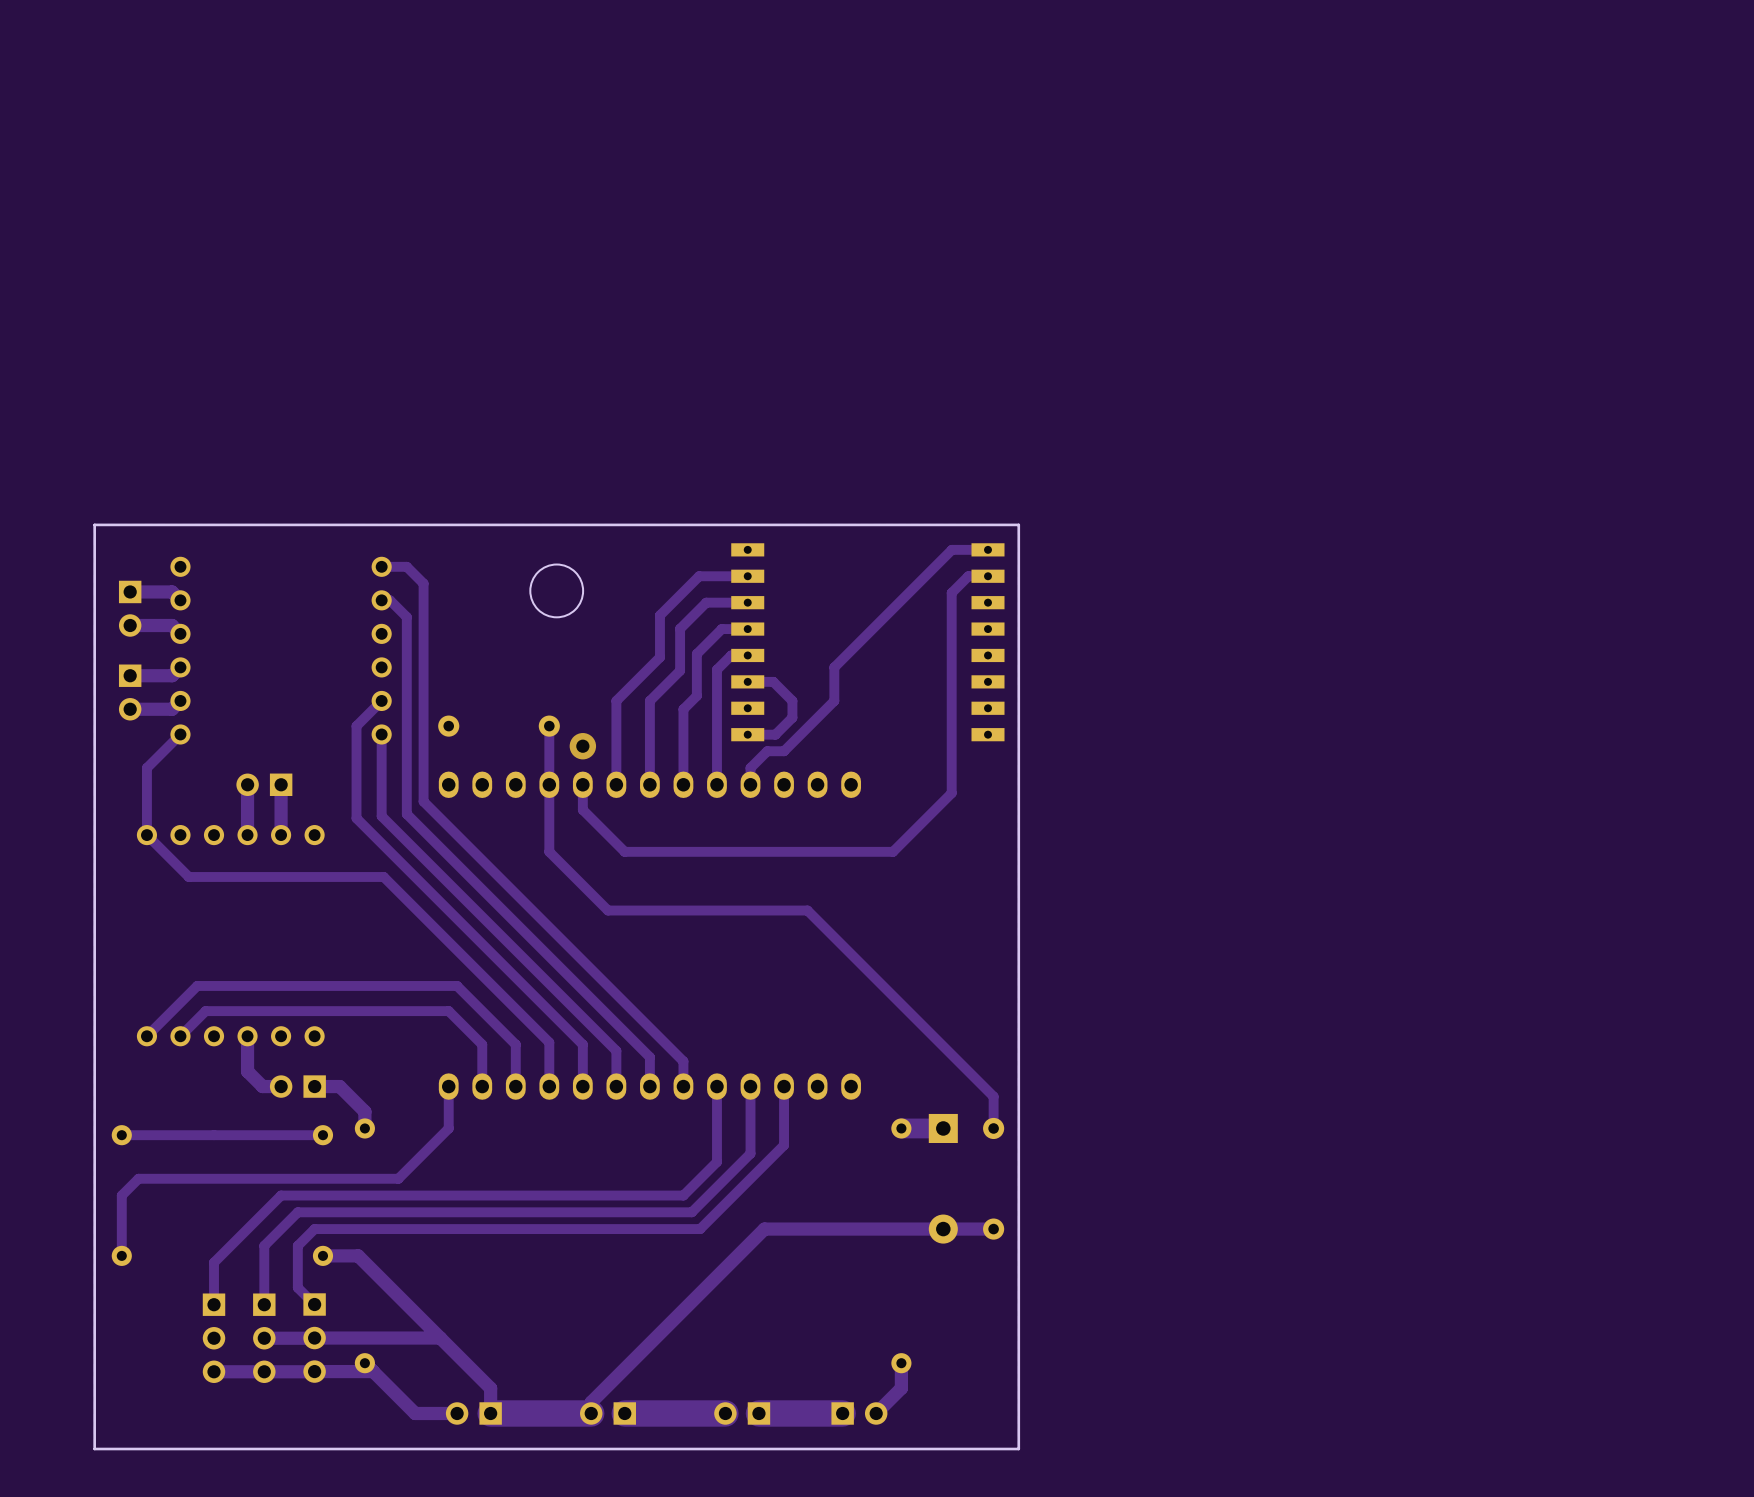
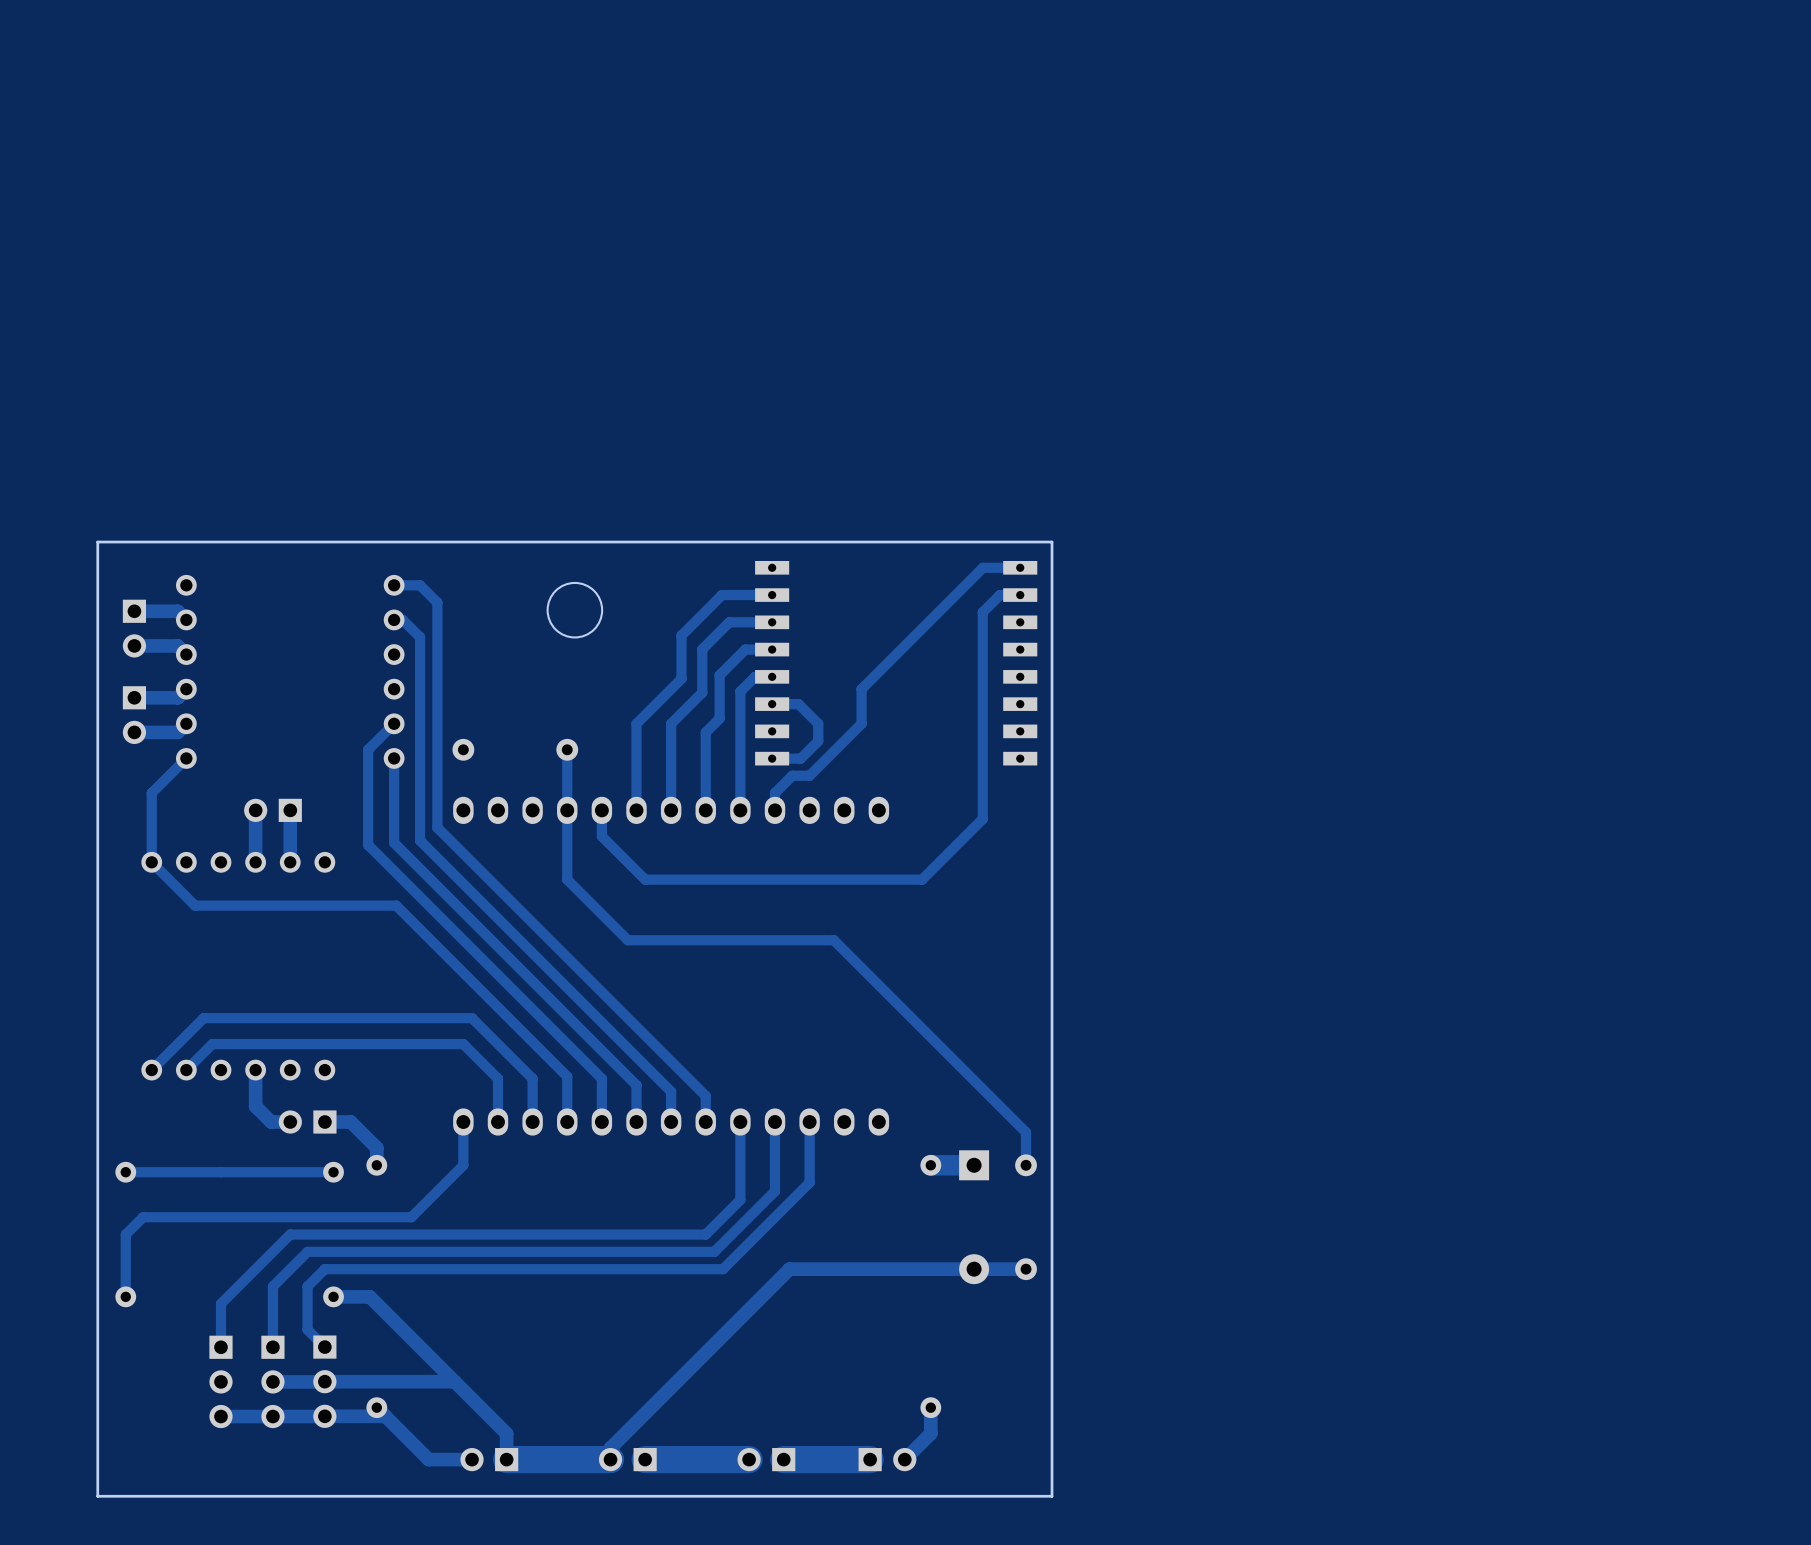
via: (582, 746) -> none

